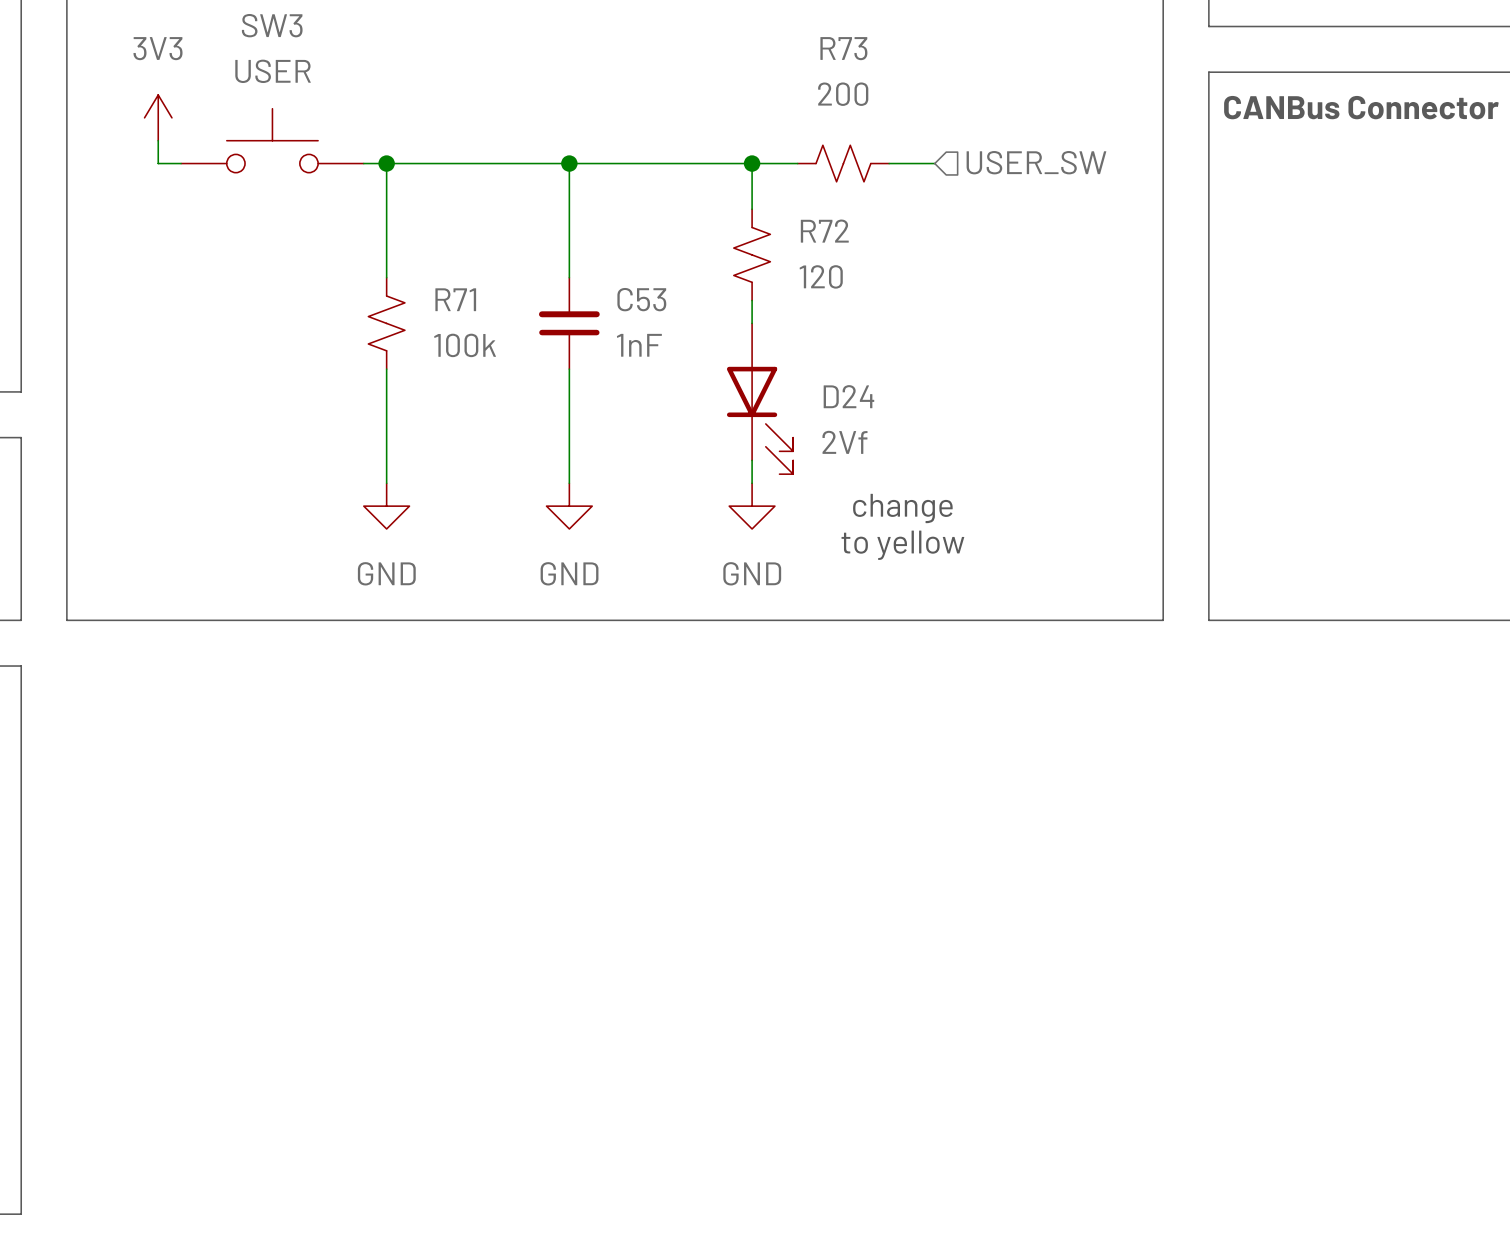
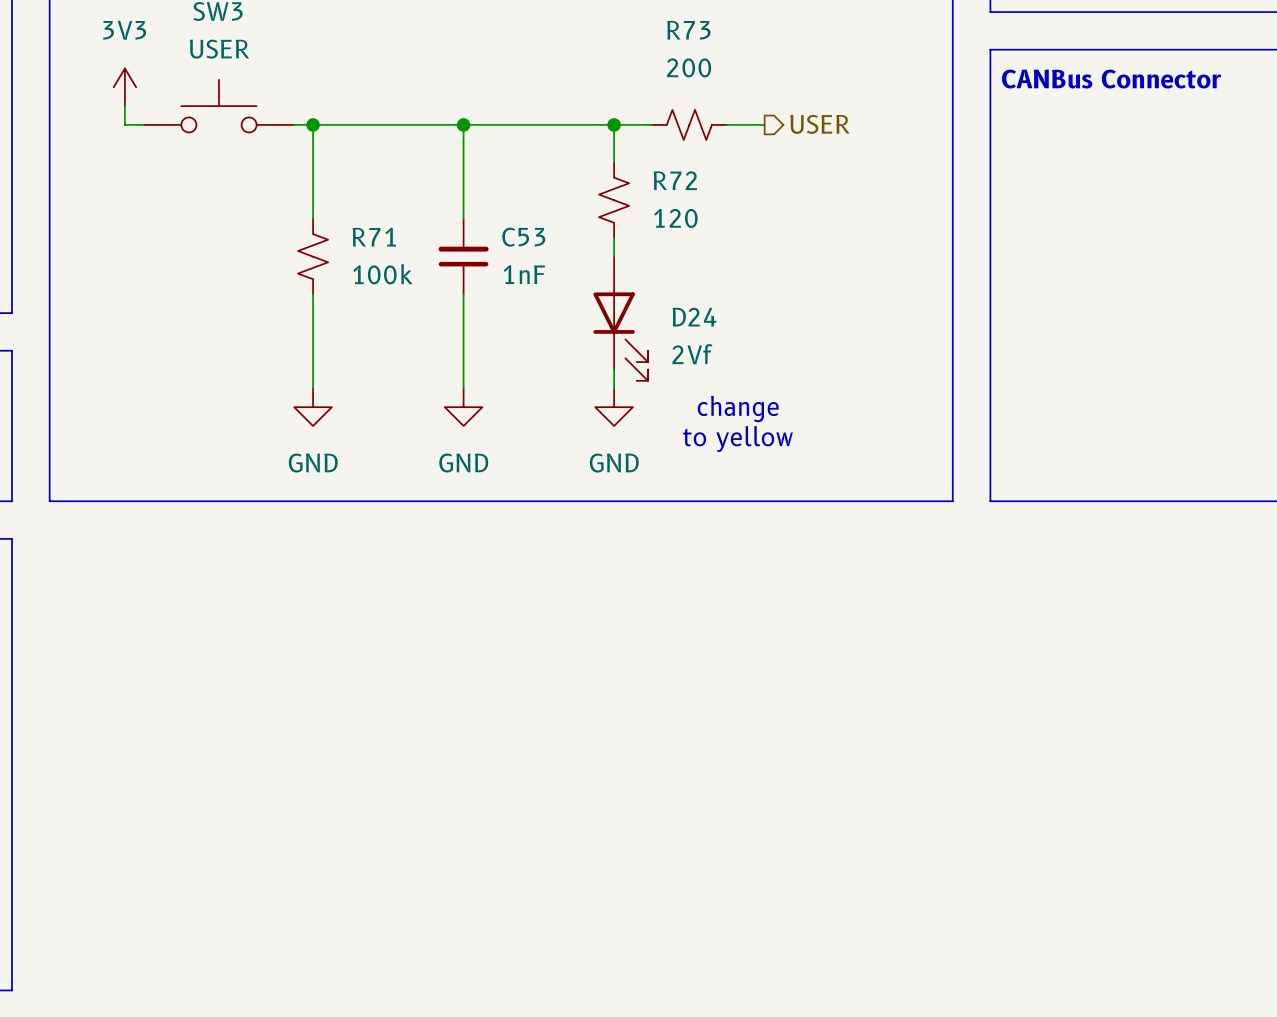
hierarchical label shape: input (1036, 162) -> output (819, 124)
hierarchical label: USER_SW (1036, 162) -> USER (819, 124)

